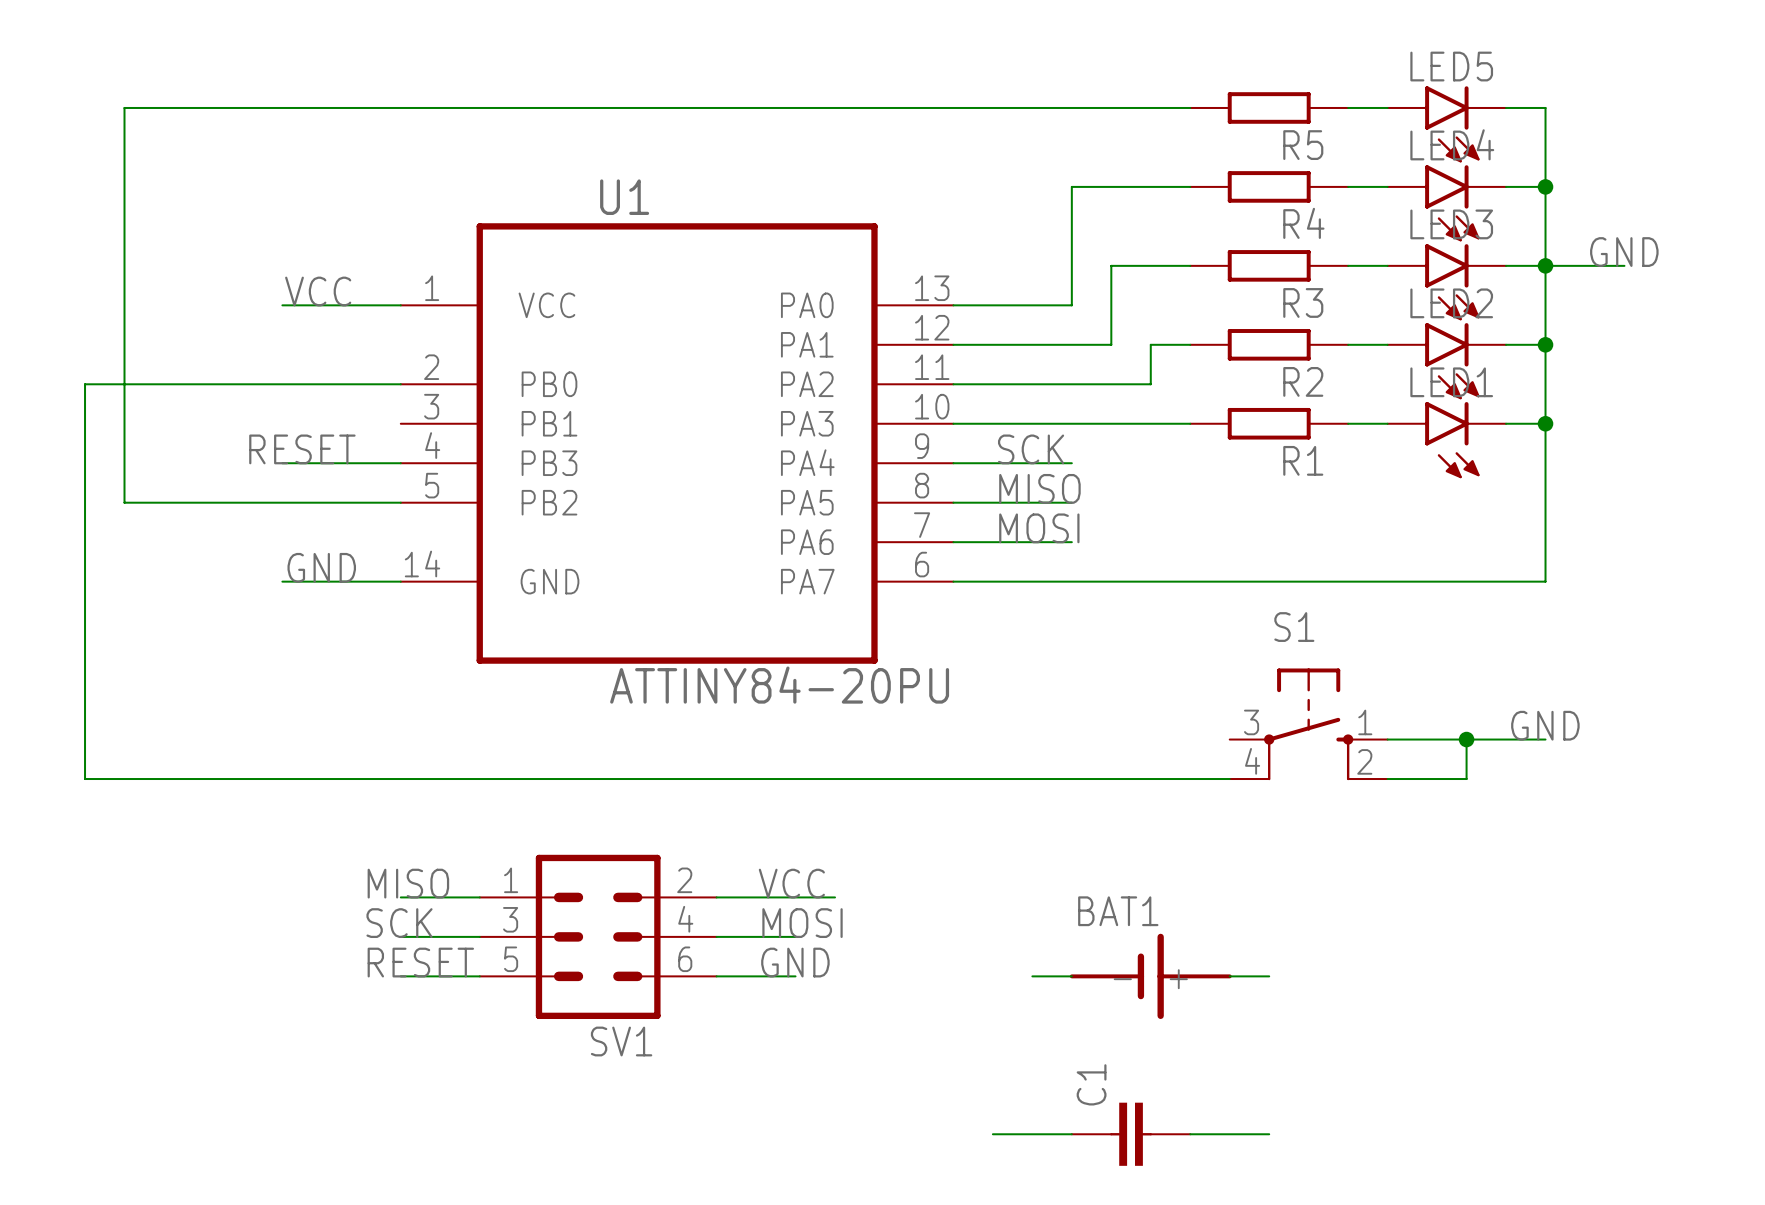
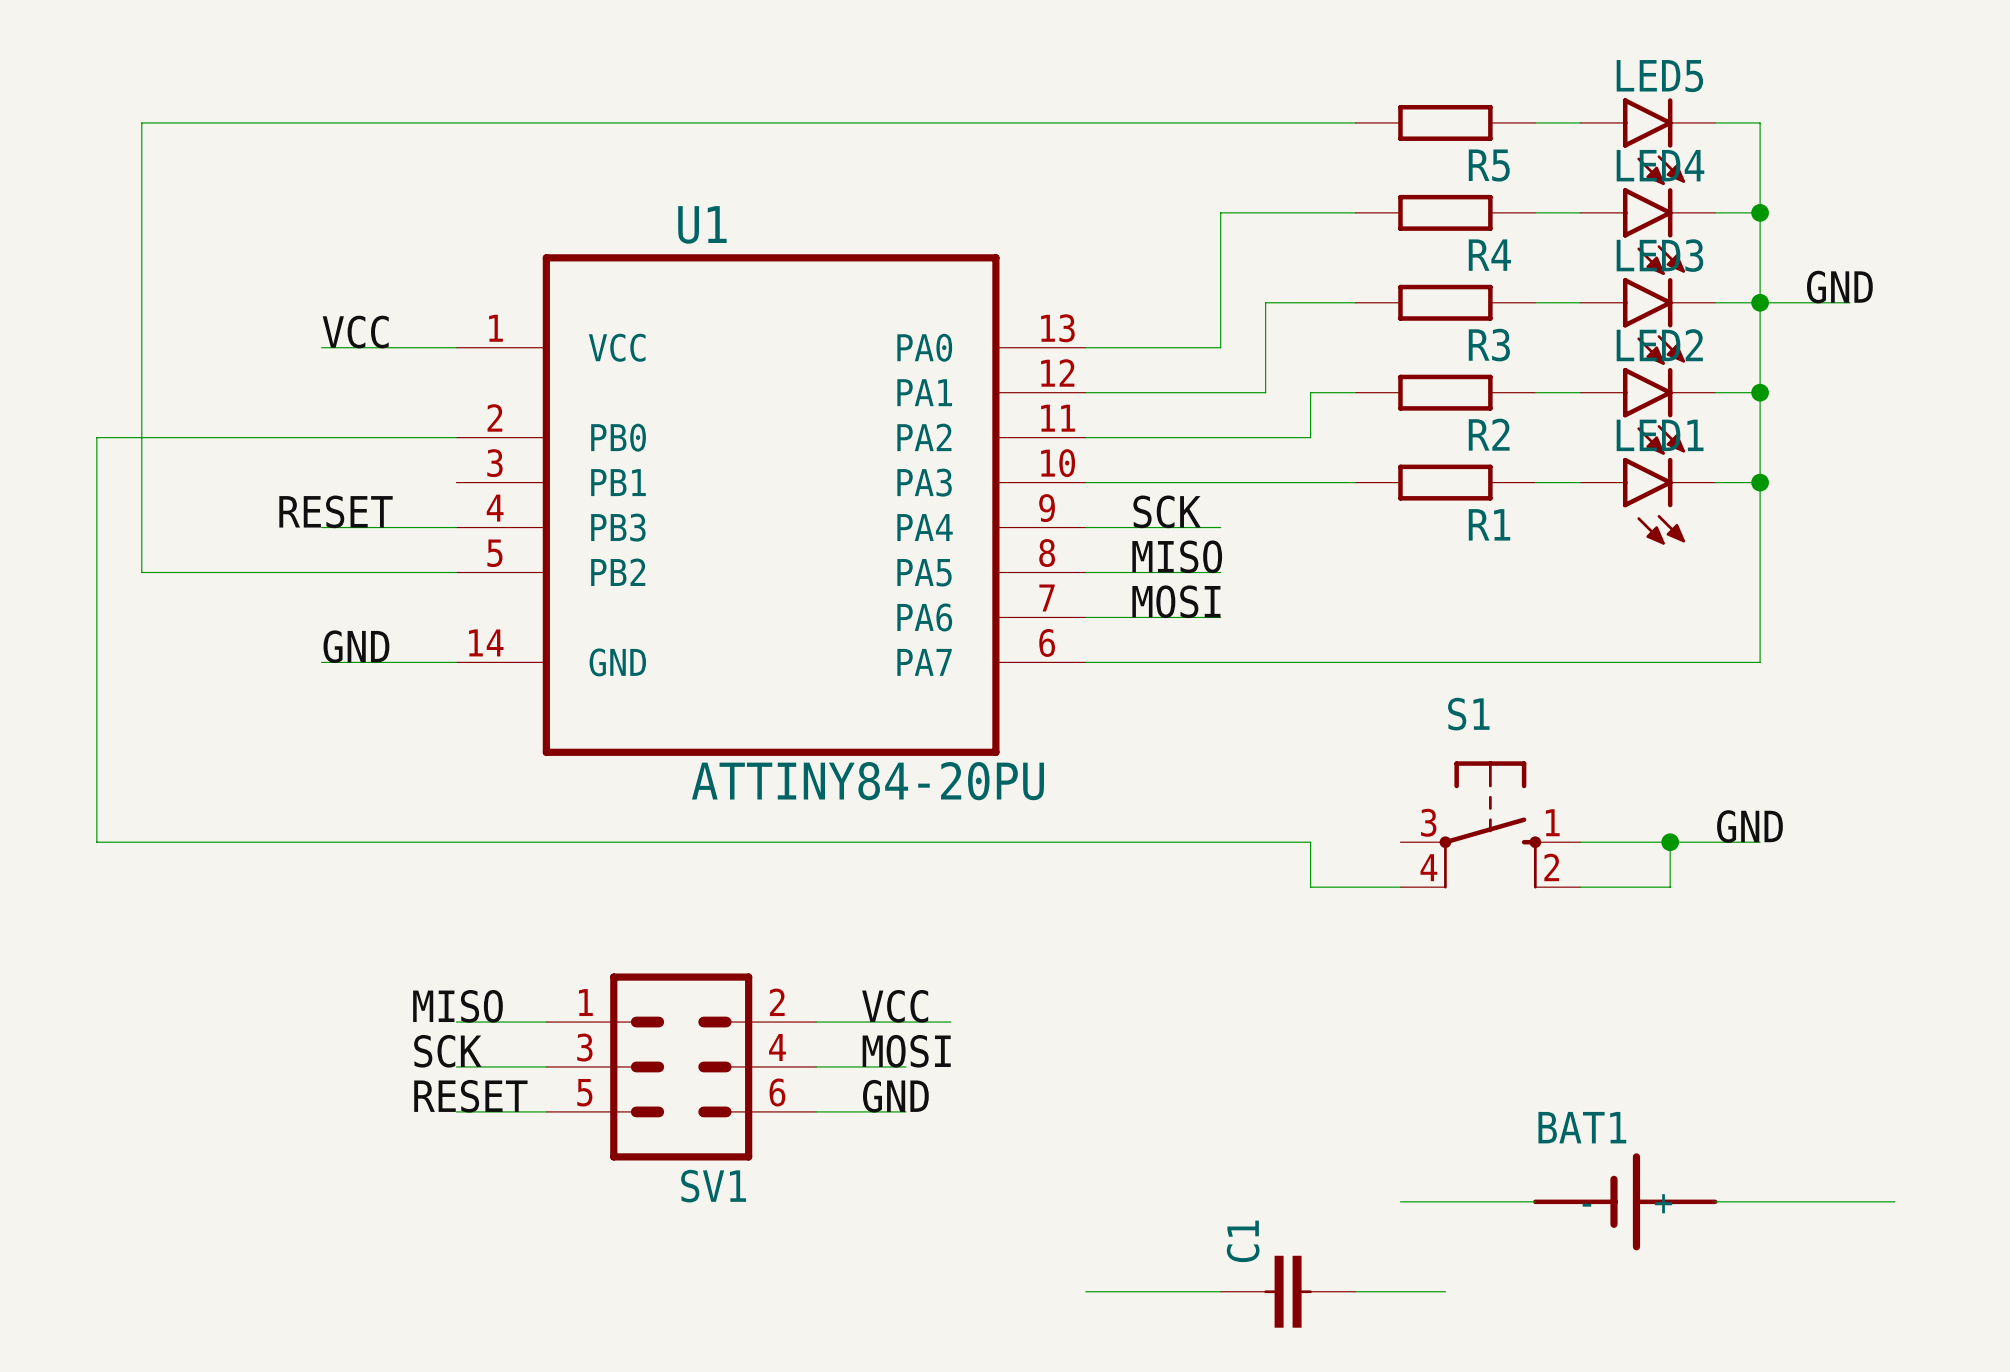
wire: (85, 739) (85, 779) (1150, 779) -> (96, 842) (1310, 842) (1310, 887)
wire: (1032, 976) (1071, 976) -> (1085, 1291) (1130, 1291)
BAT1 position: (1150, 976) -> (1625, 1201)
wire: (1229, 976) (1269, 976) -> none
wire: none -> (1400, 1201) (1535, 1201)
wire: none -> (1715, 1201) (1894, 1201)

